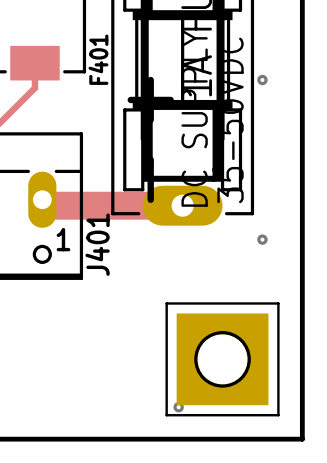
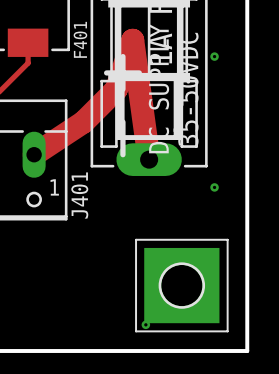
top track: (42, 199) (48, 205) (182, 205) -> (34, 154) (83, 122) (116, 89) (132, 40) (149, 159)

